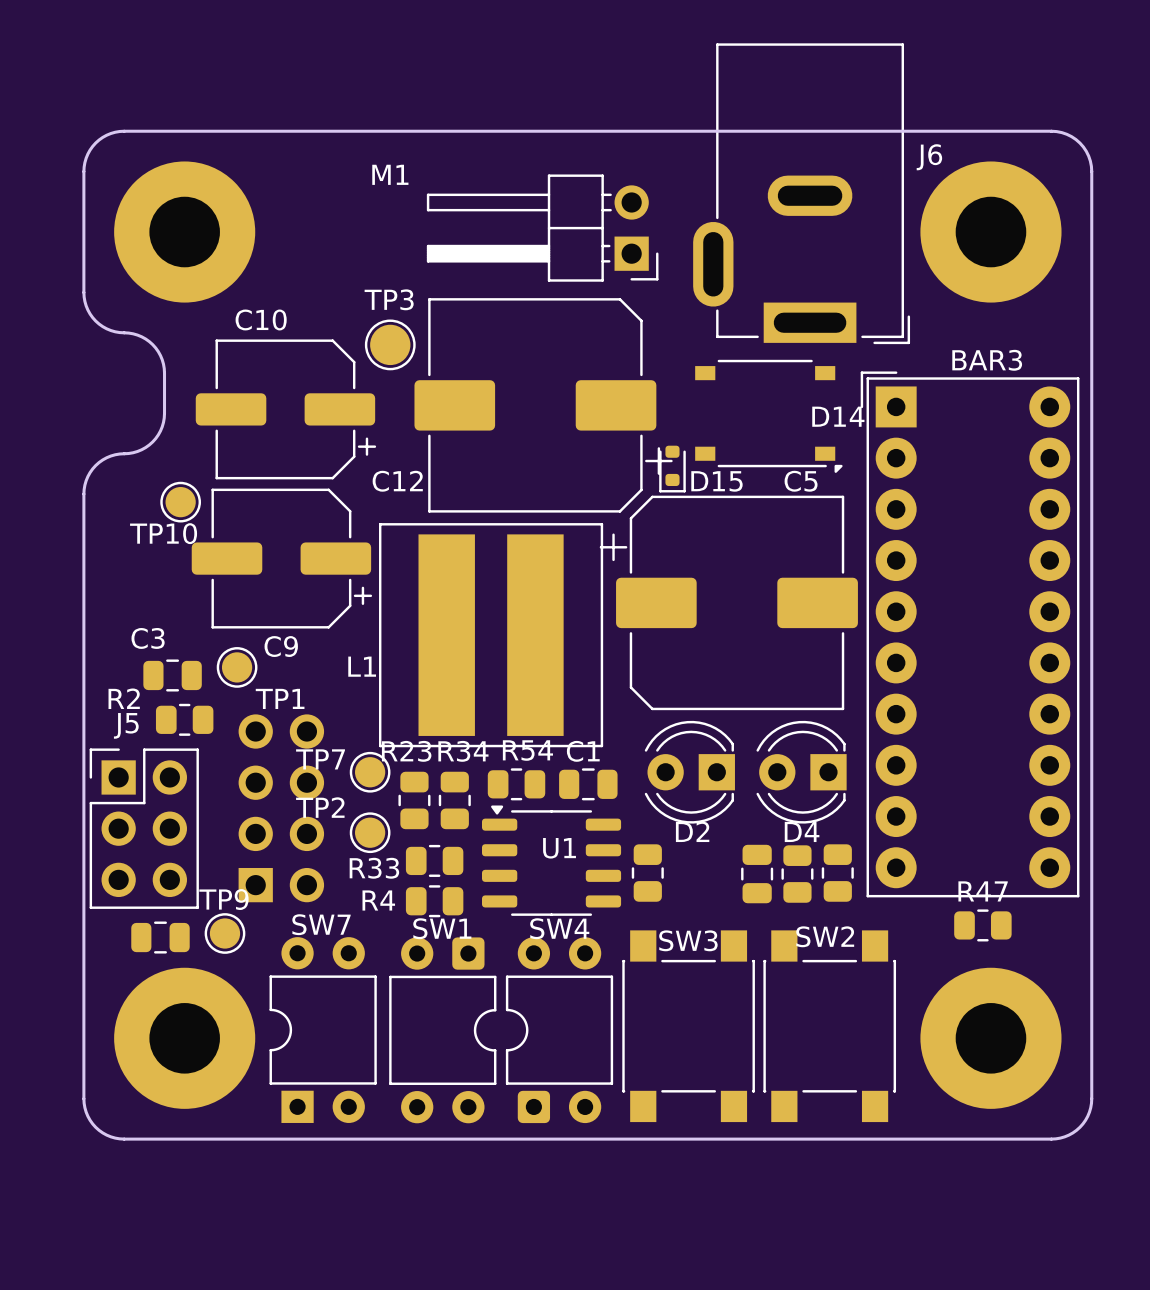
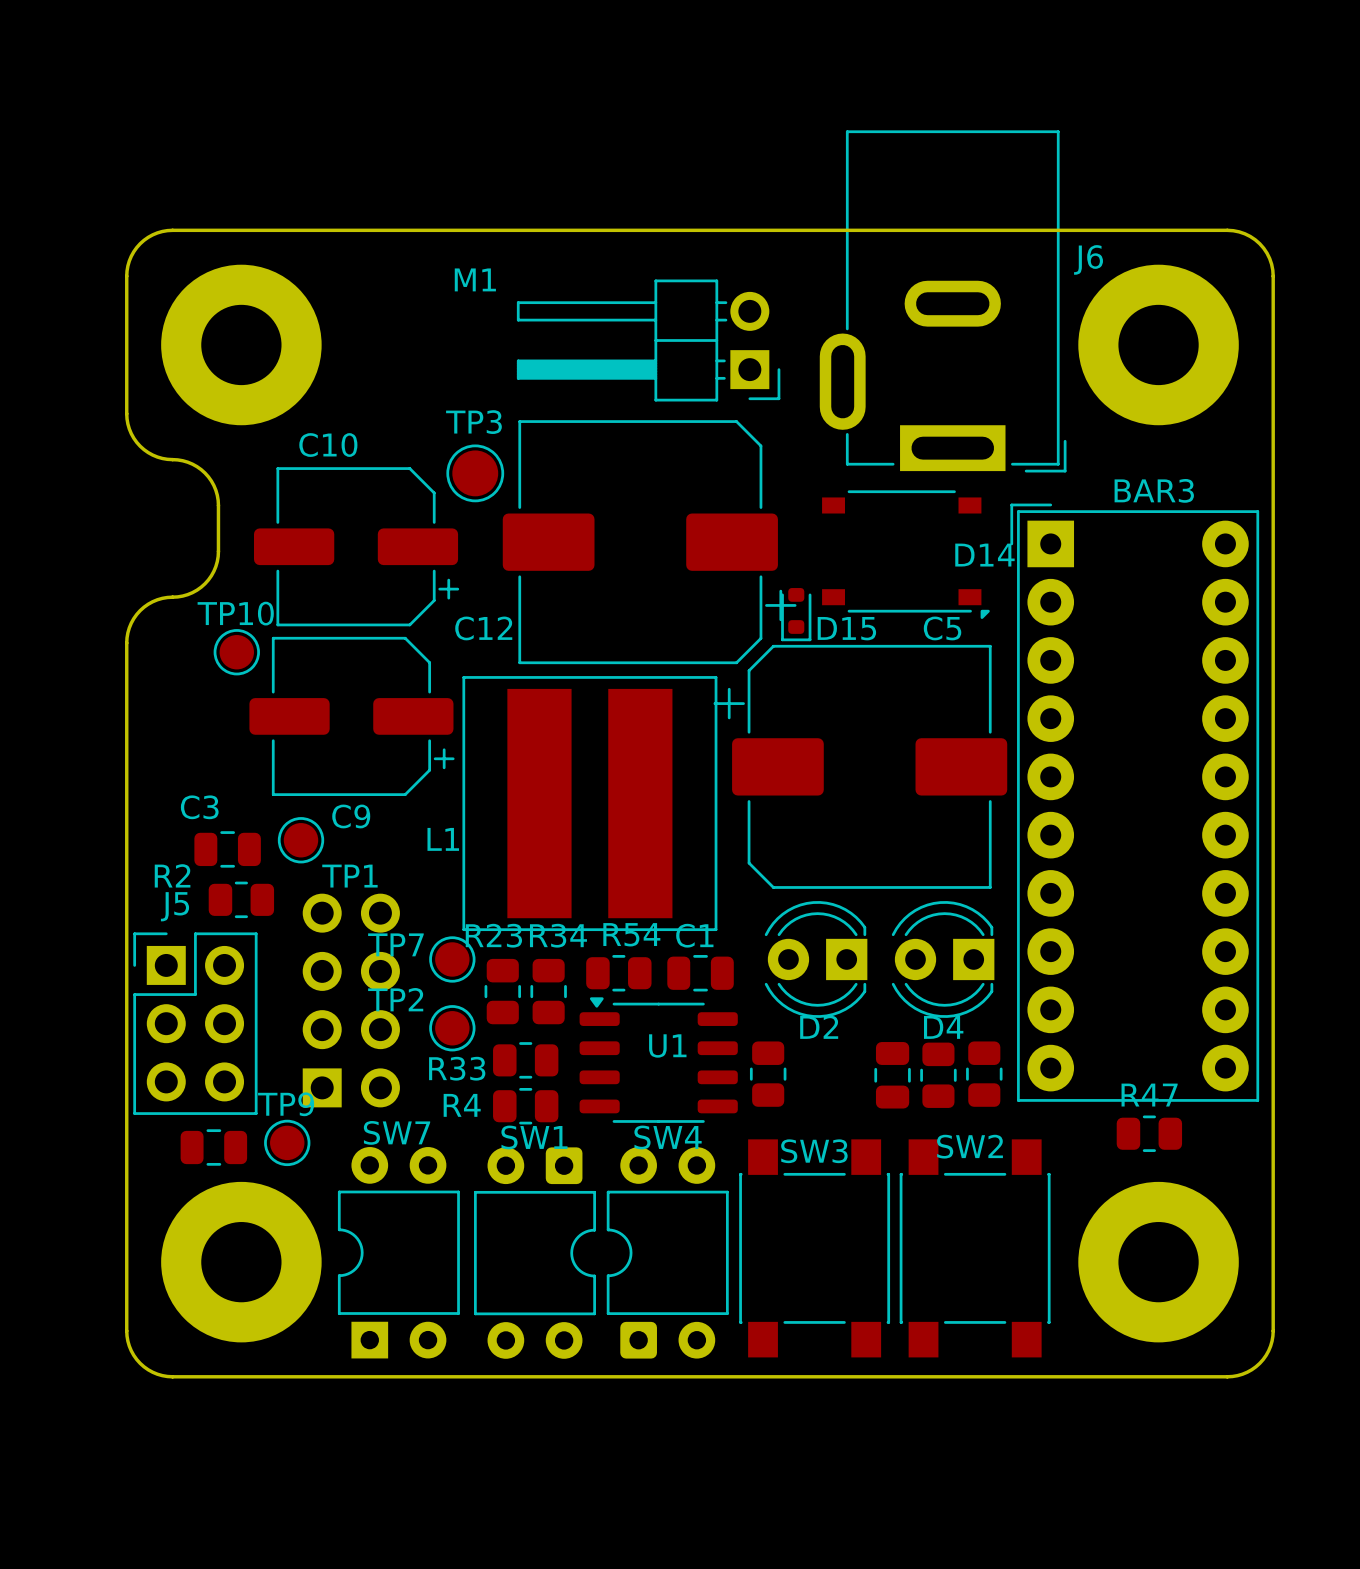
TP10 name position: TP10 (163, 533) -> TP10 (235, 613)

